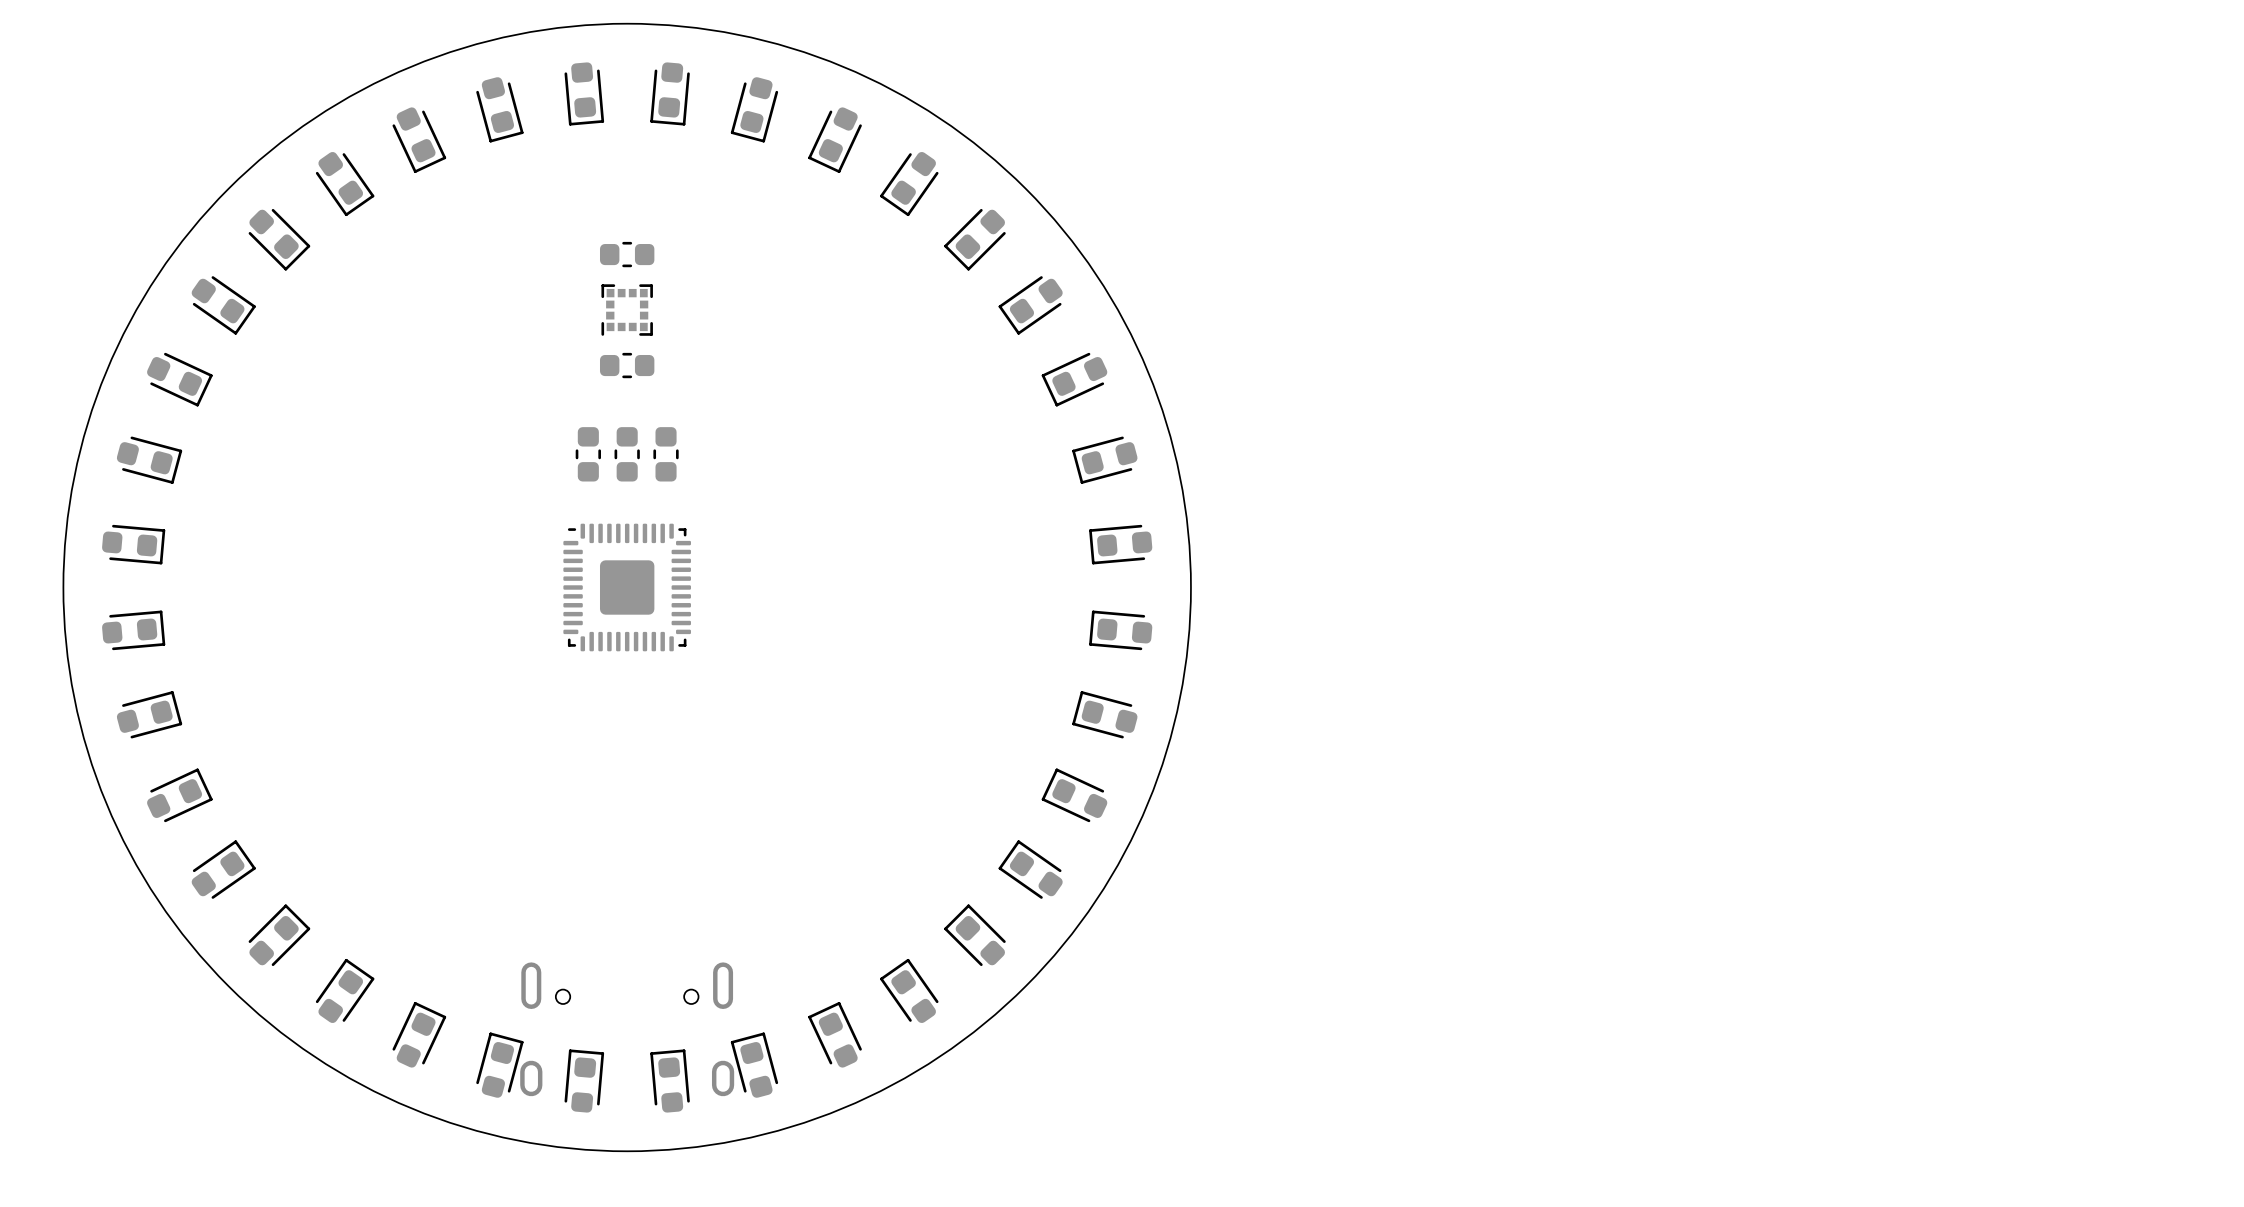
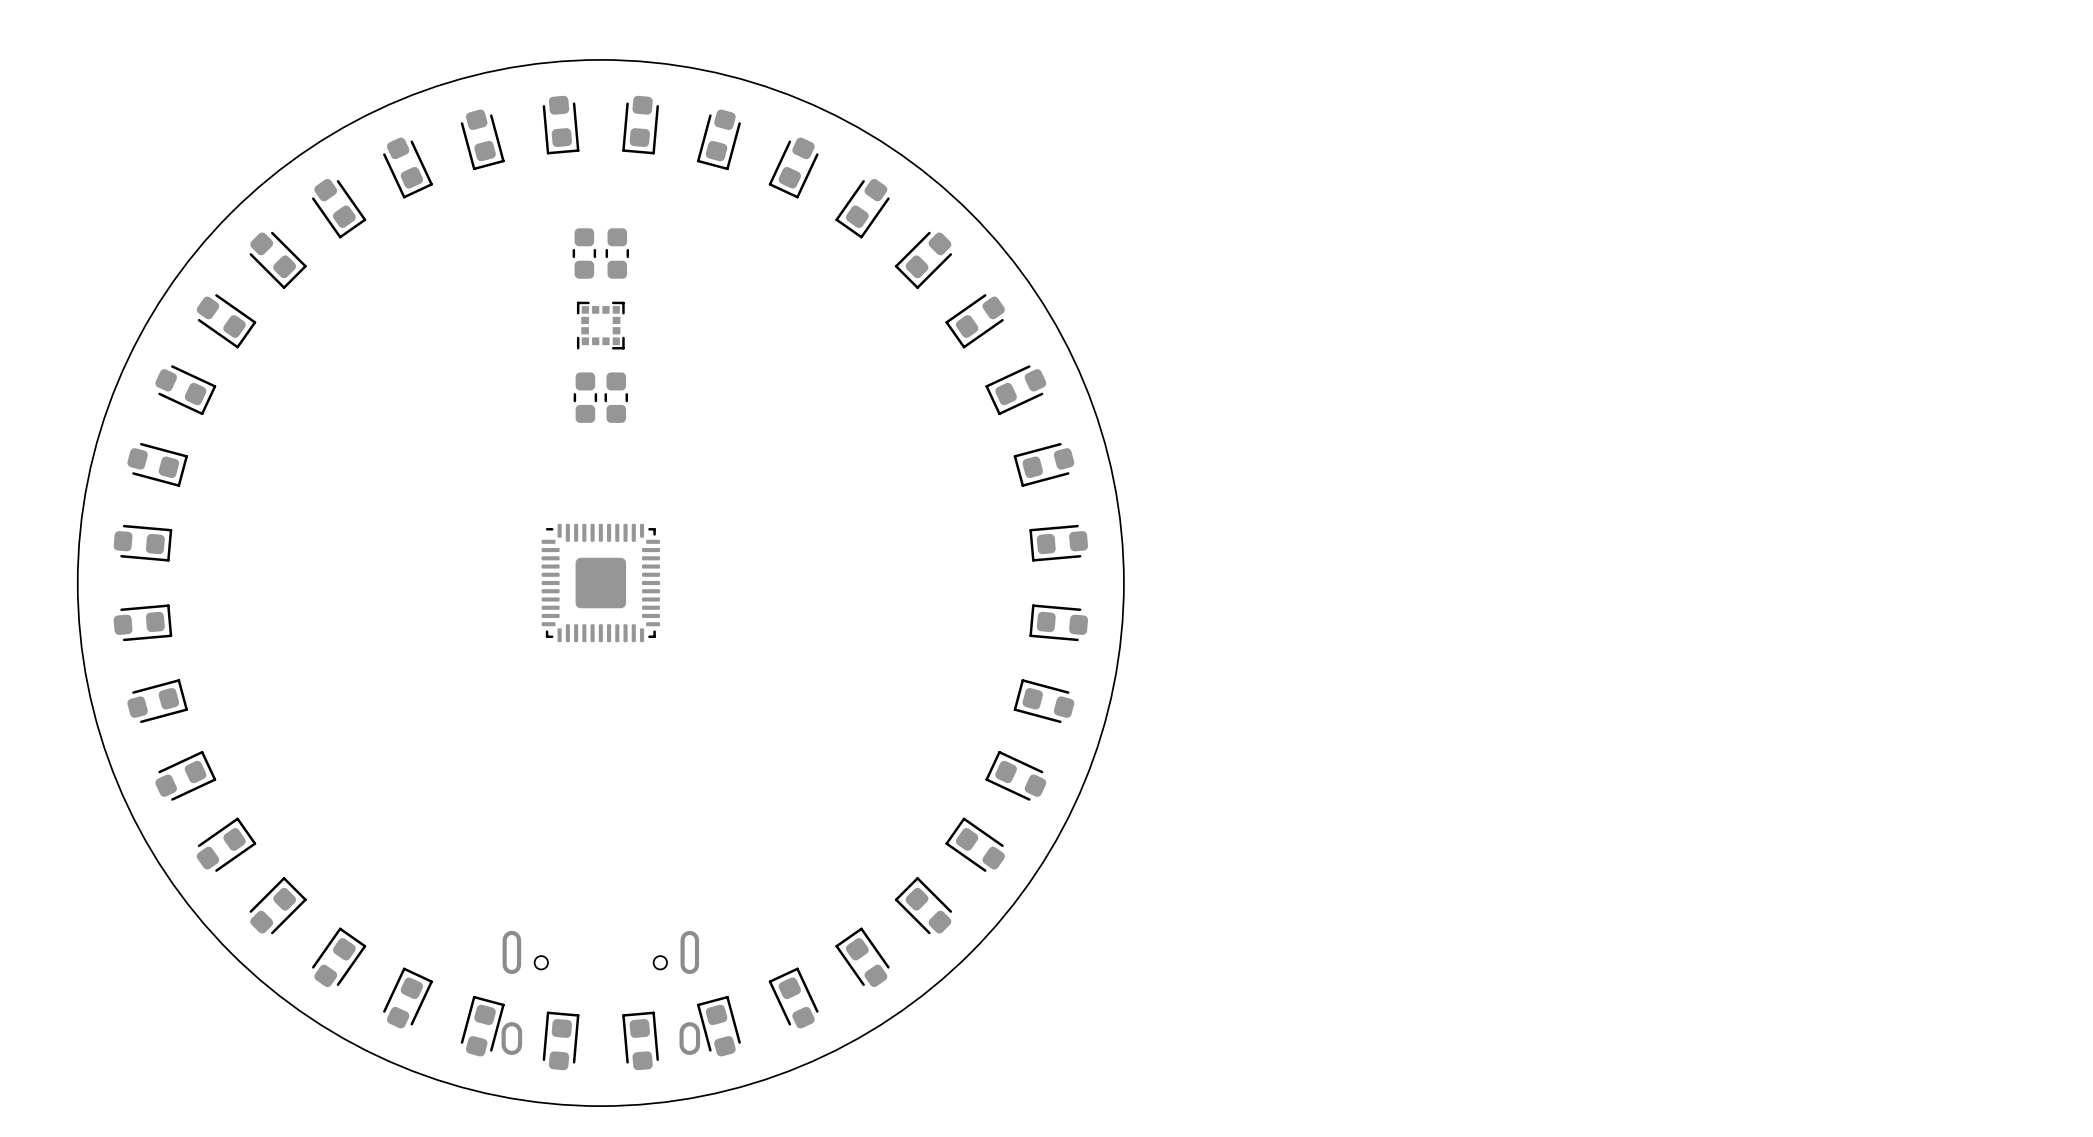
part: none -> (584, 253)
part: none -> (617, 253)
part: (627, 254) -> none
part: (627, 365) -> none
part: none -> (585, 397)
part: none -> (616, 397)
part: (588, 454) -> none
part: (627, 454) -> none
part: (666, 454) -> none

